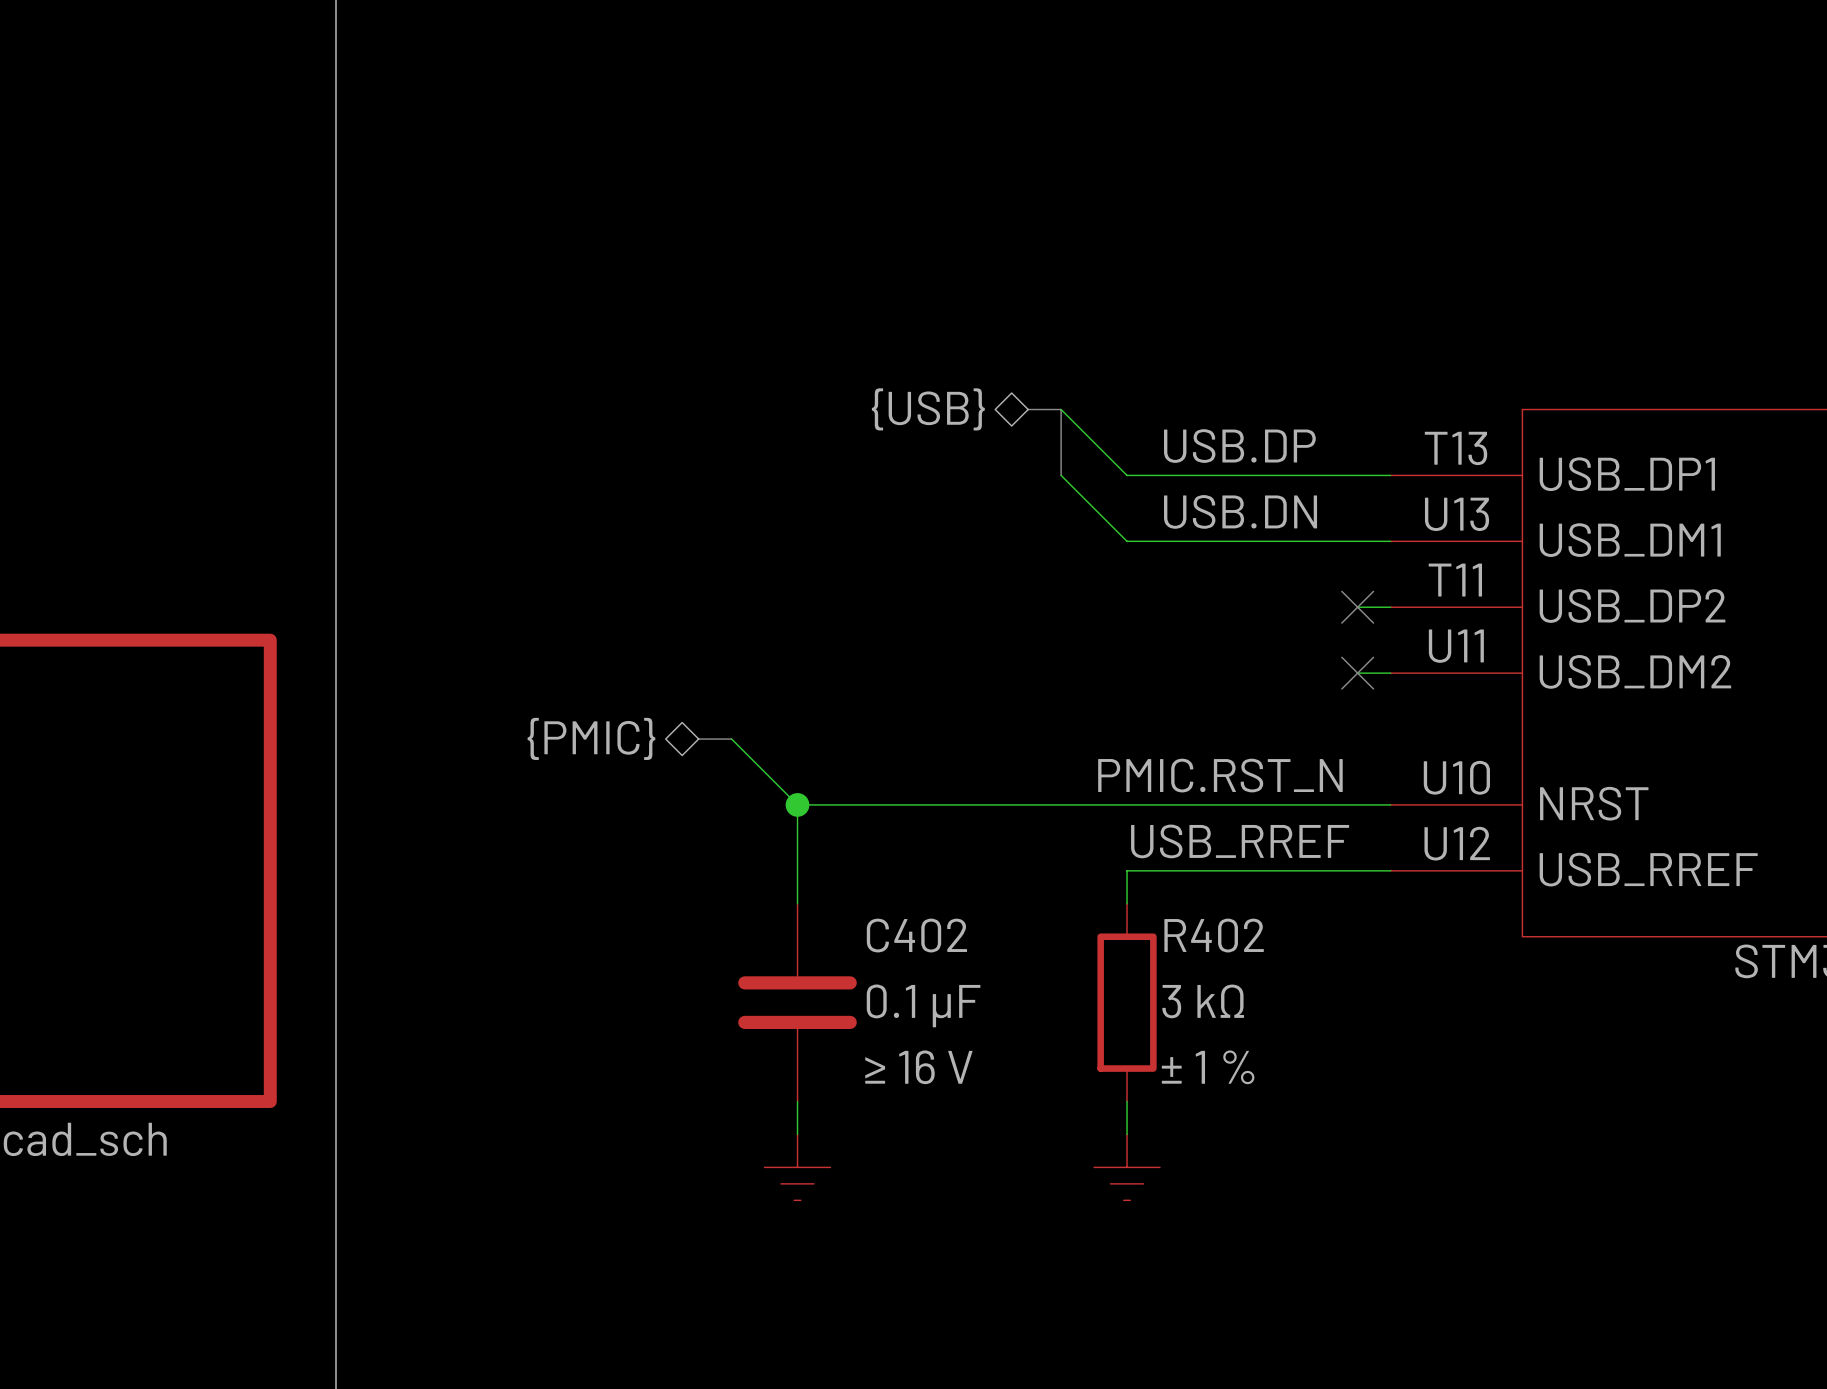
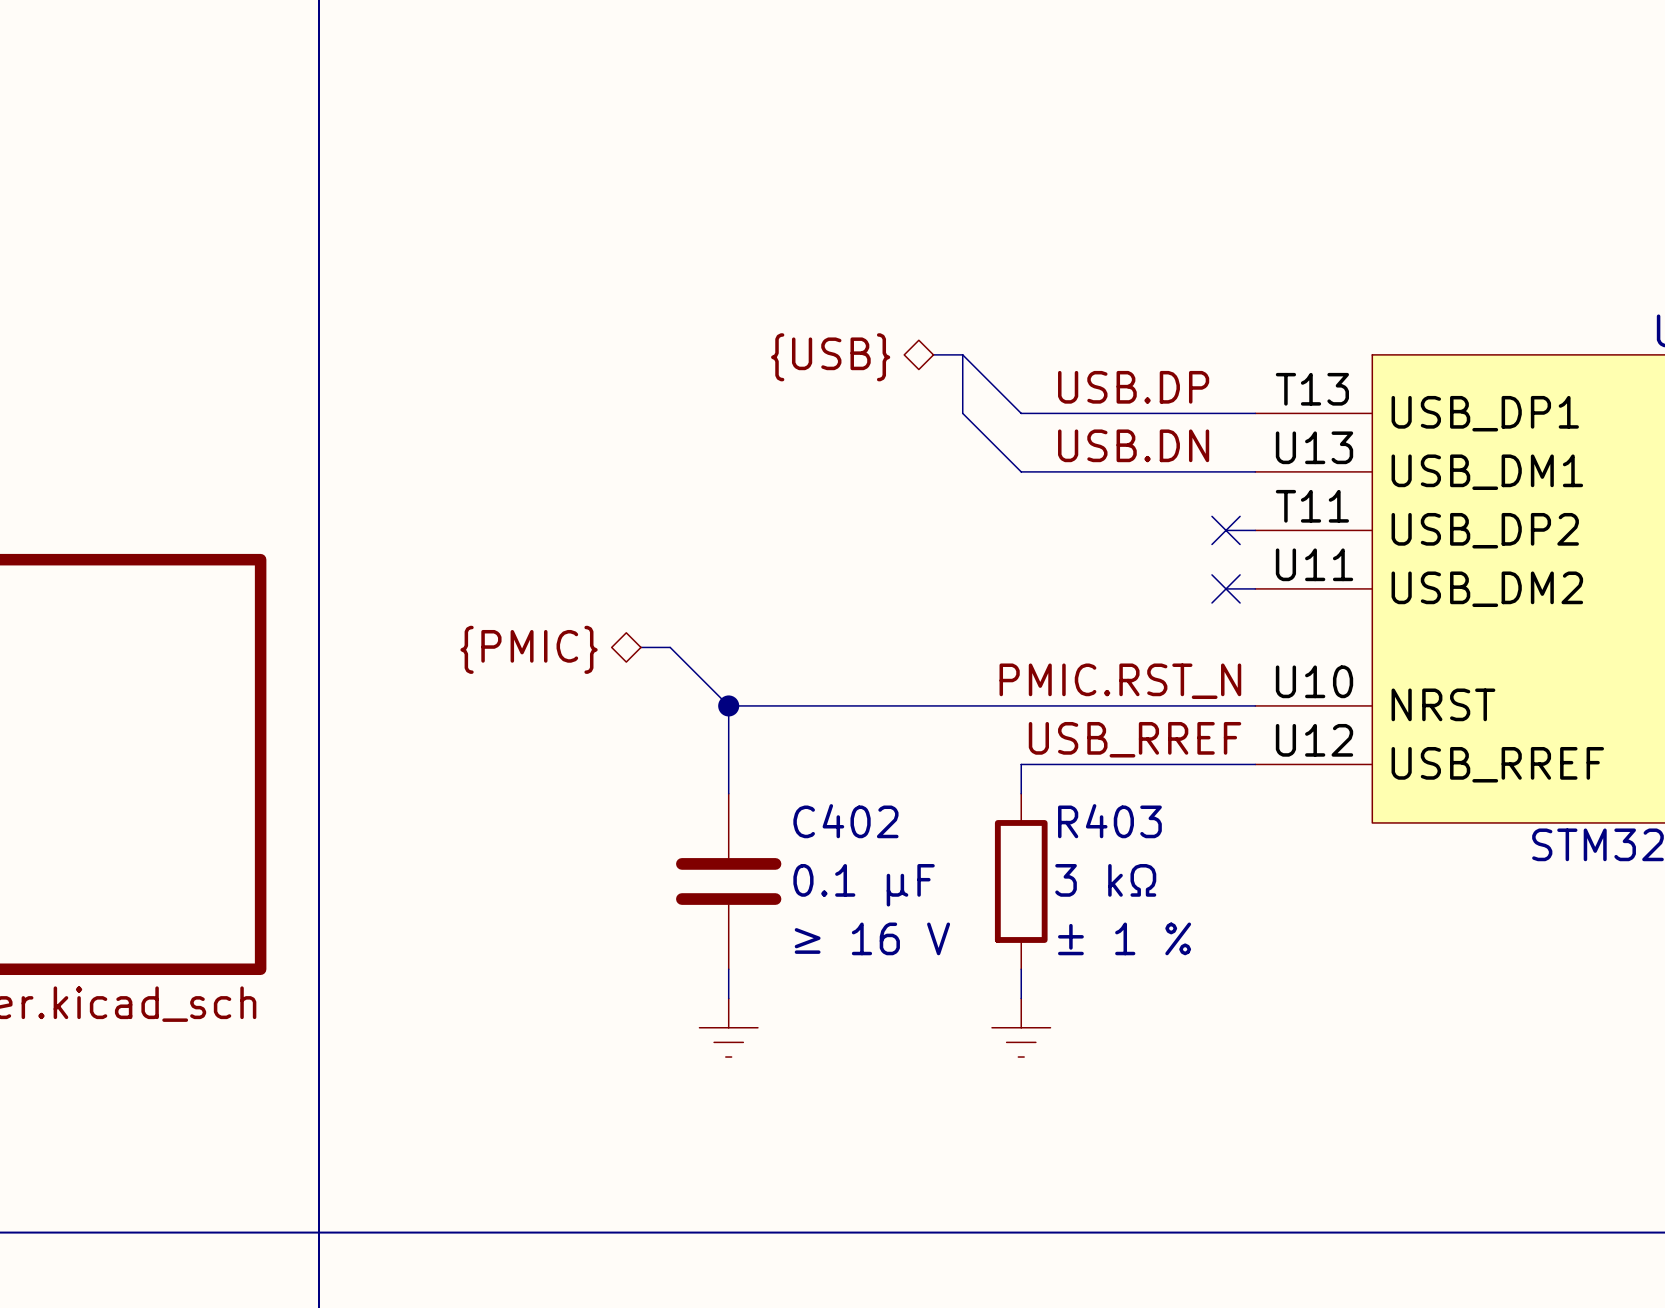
R402 name: R402 (1214, 935) -> R403 (1109, 821)

